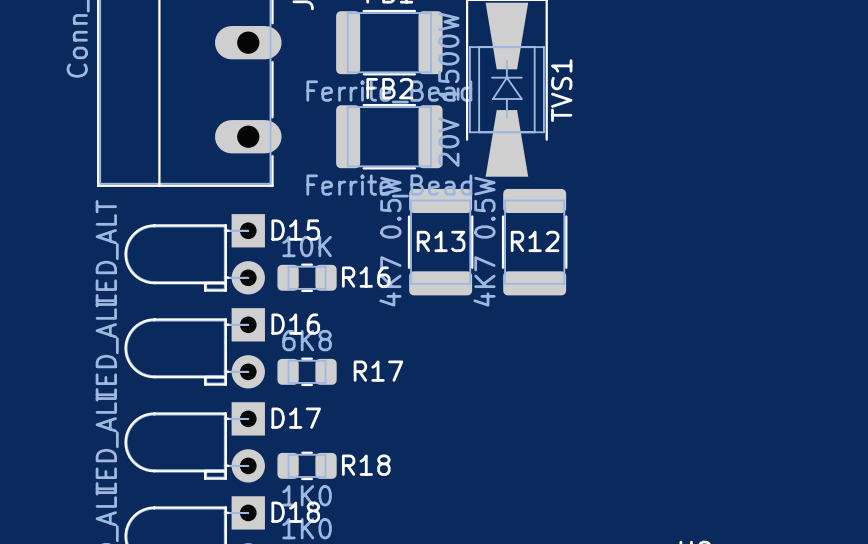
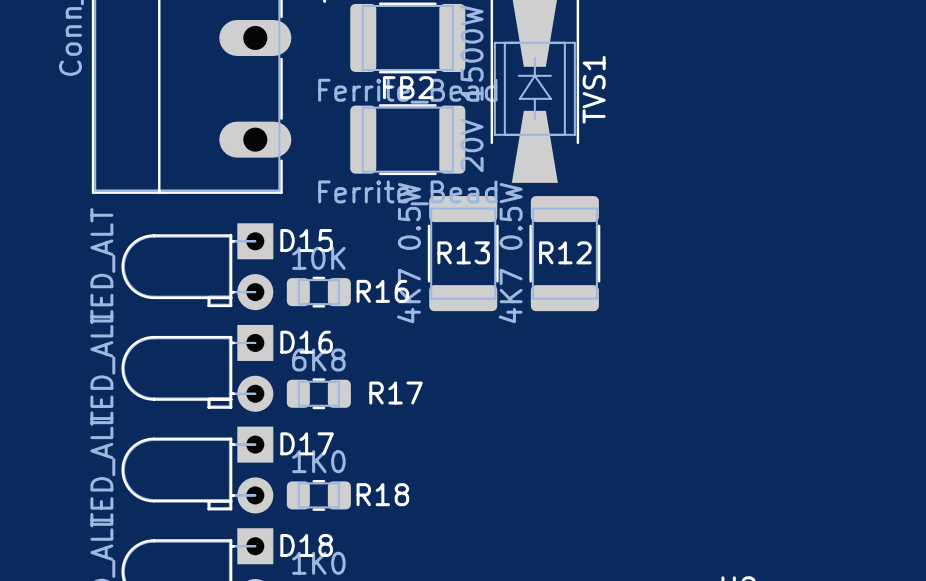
R18 value position: 1K0 (307, 495) -> 1K0 (318, 461)

